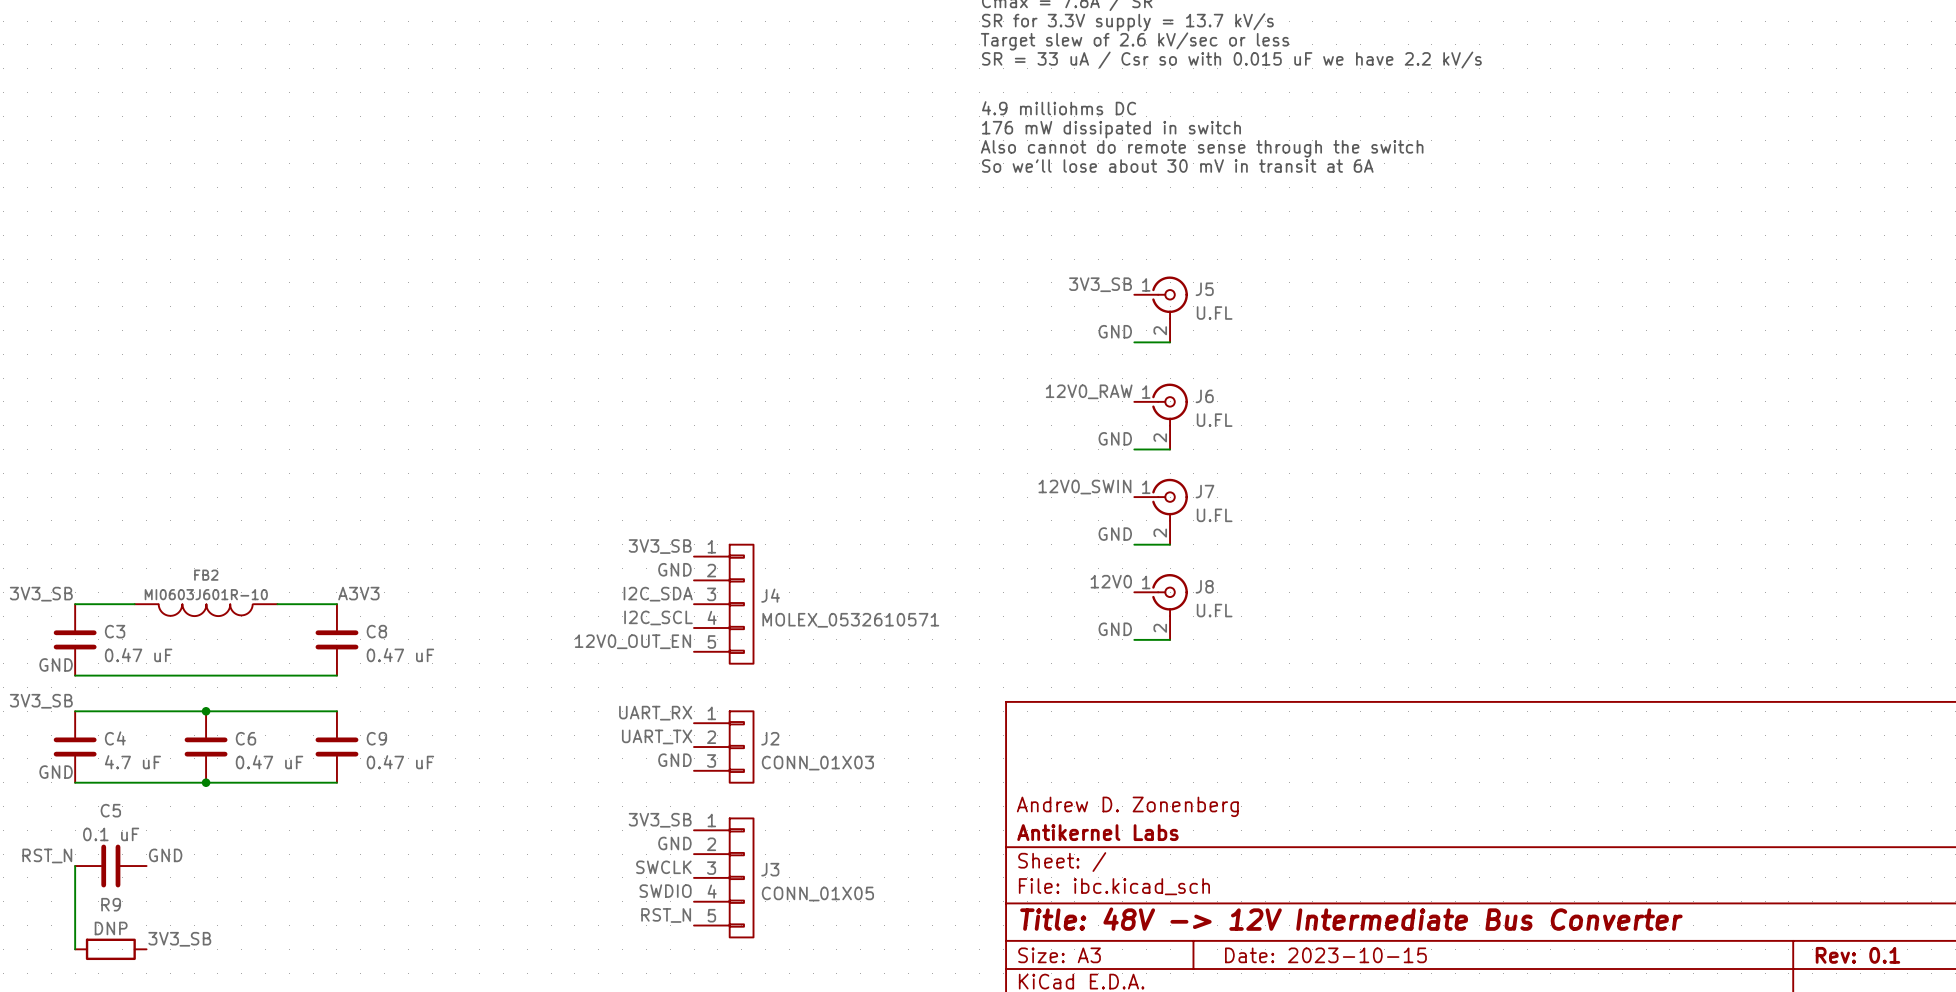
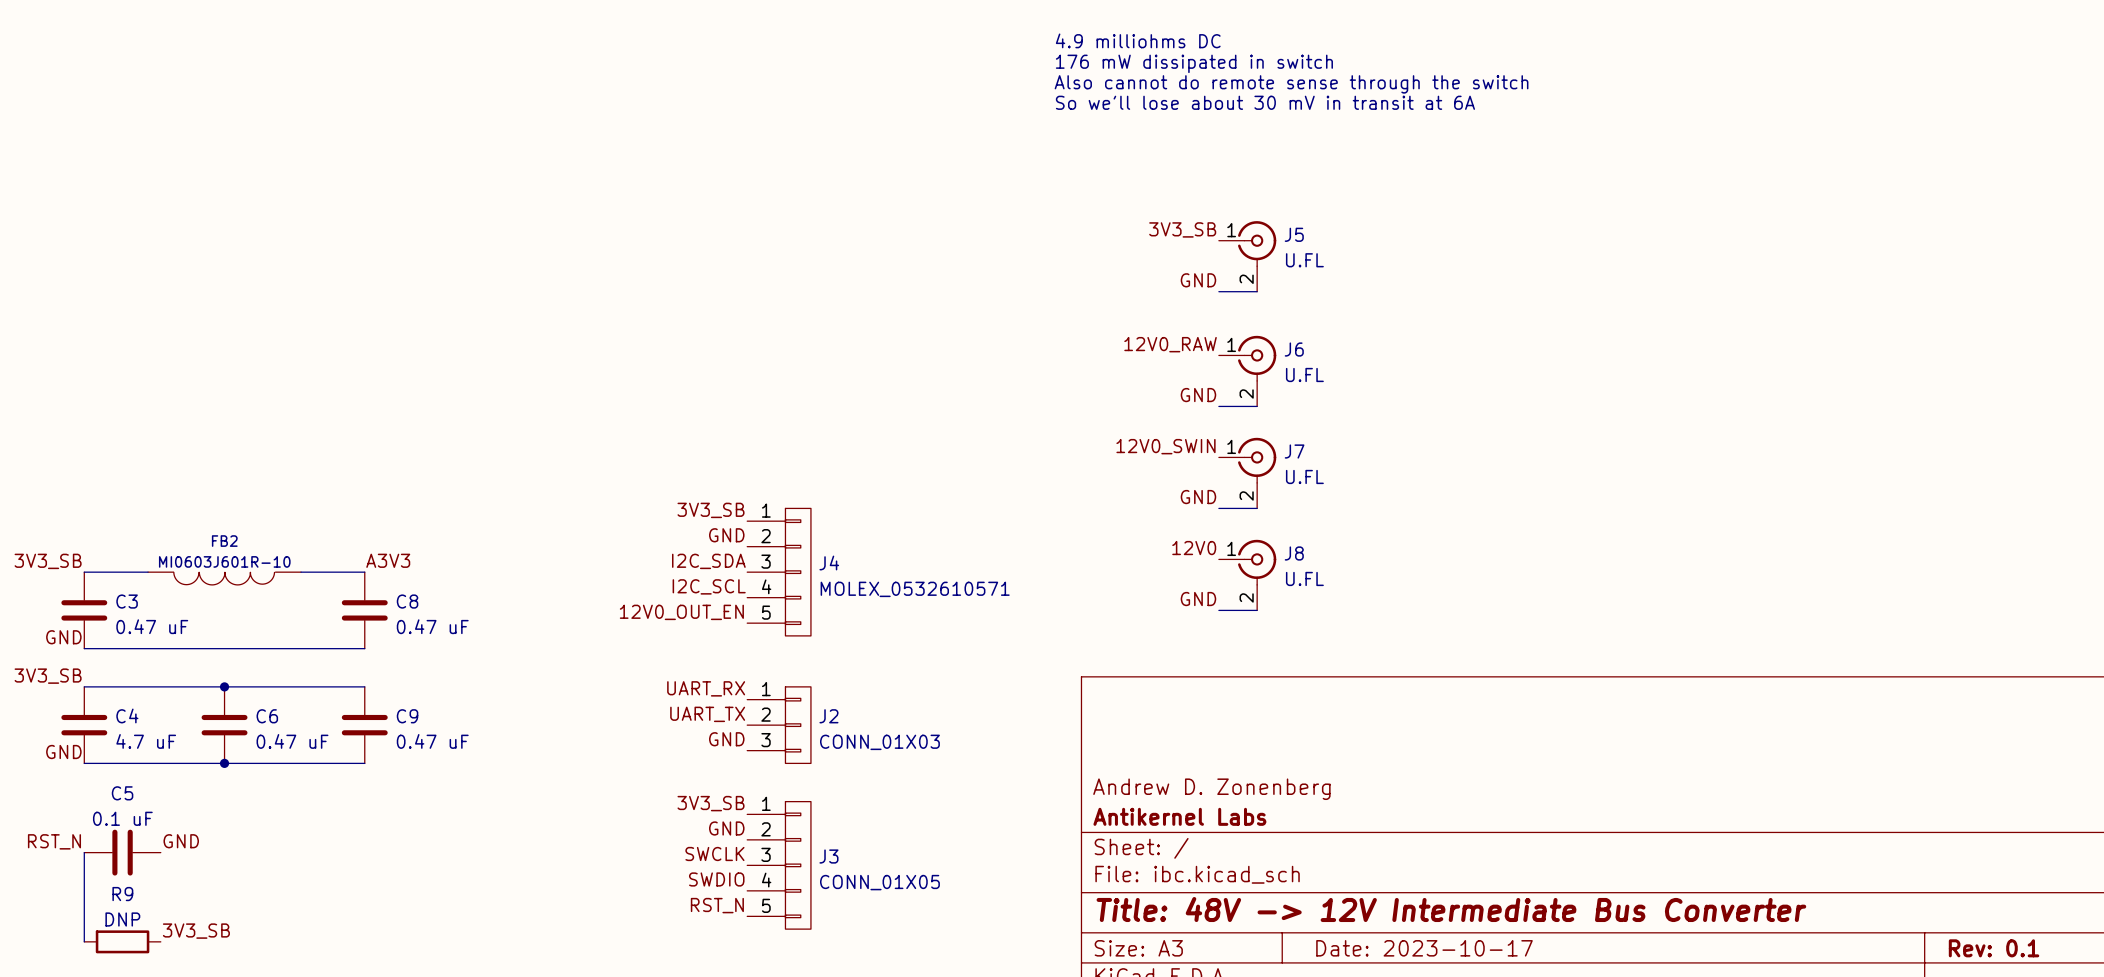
title block: Date: 2023-10-15 (1325, 955) -> Date: 2023-10-17 (1424, 948)

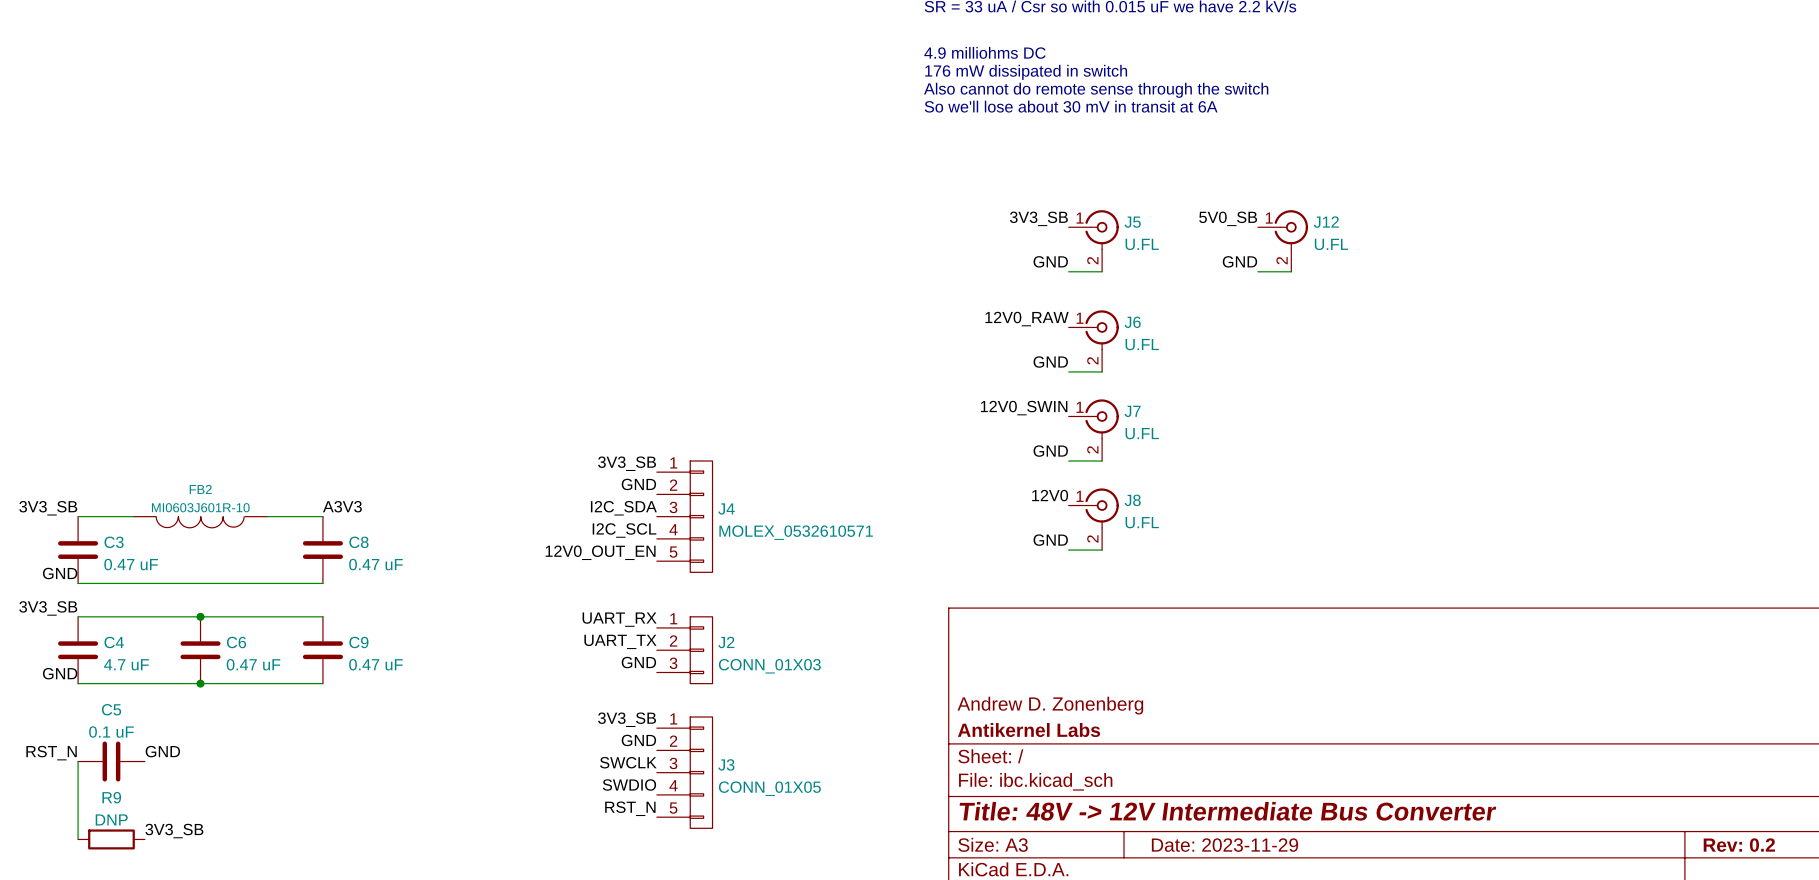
label: none -> 5V0_SB (1228, 218)
J12: none -> U.FL (1282, 240)
label: none -> GND (1239, 261)
wire: none -> (1257, 271) (1291, 271)
title block: Date: 2023-10-17 (1424, 948) -> Date: 2023-11-29 (1224, 845)
title block: Rev: 0.1 (1994, 948) -> Rev: 0.2 (1739, 845)

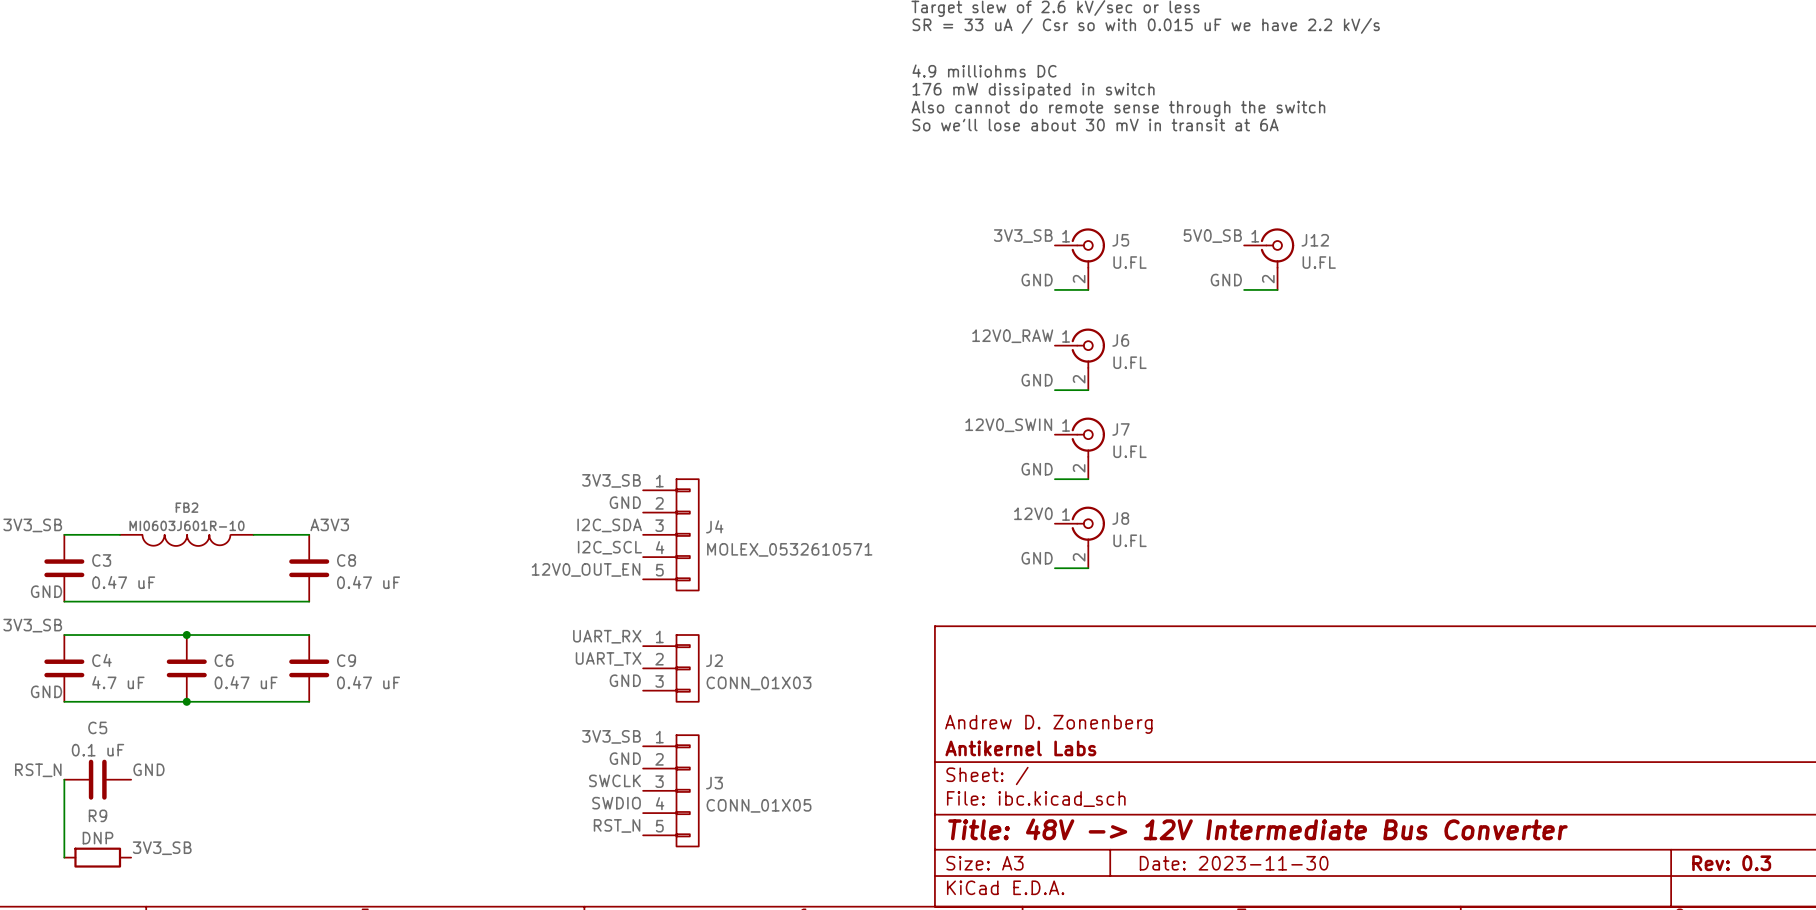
title block: Date: 2023-11-29 (1224, 845) -> Date: 2023-11-30 (1234, 863)
title block: Rev: 0.2 (1739, 845) -> Rev: 0.3 (1731, 863)

